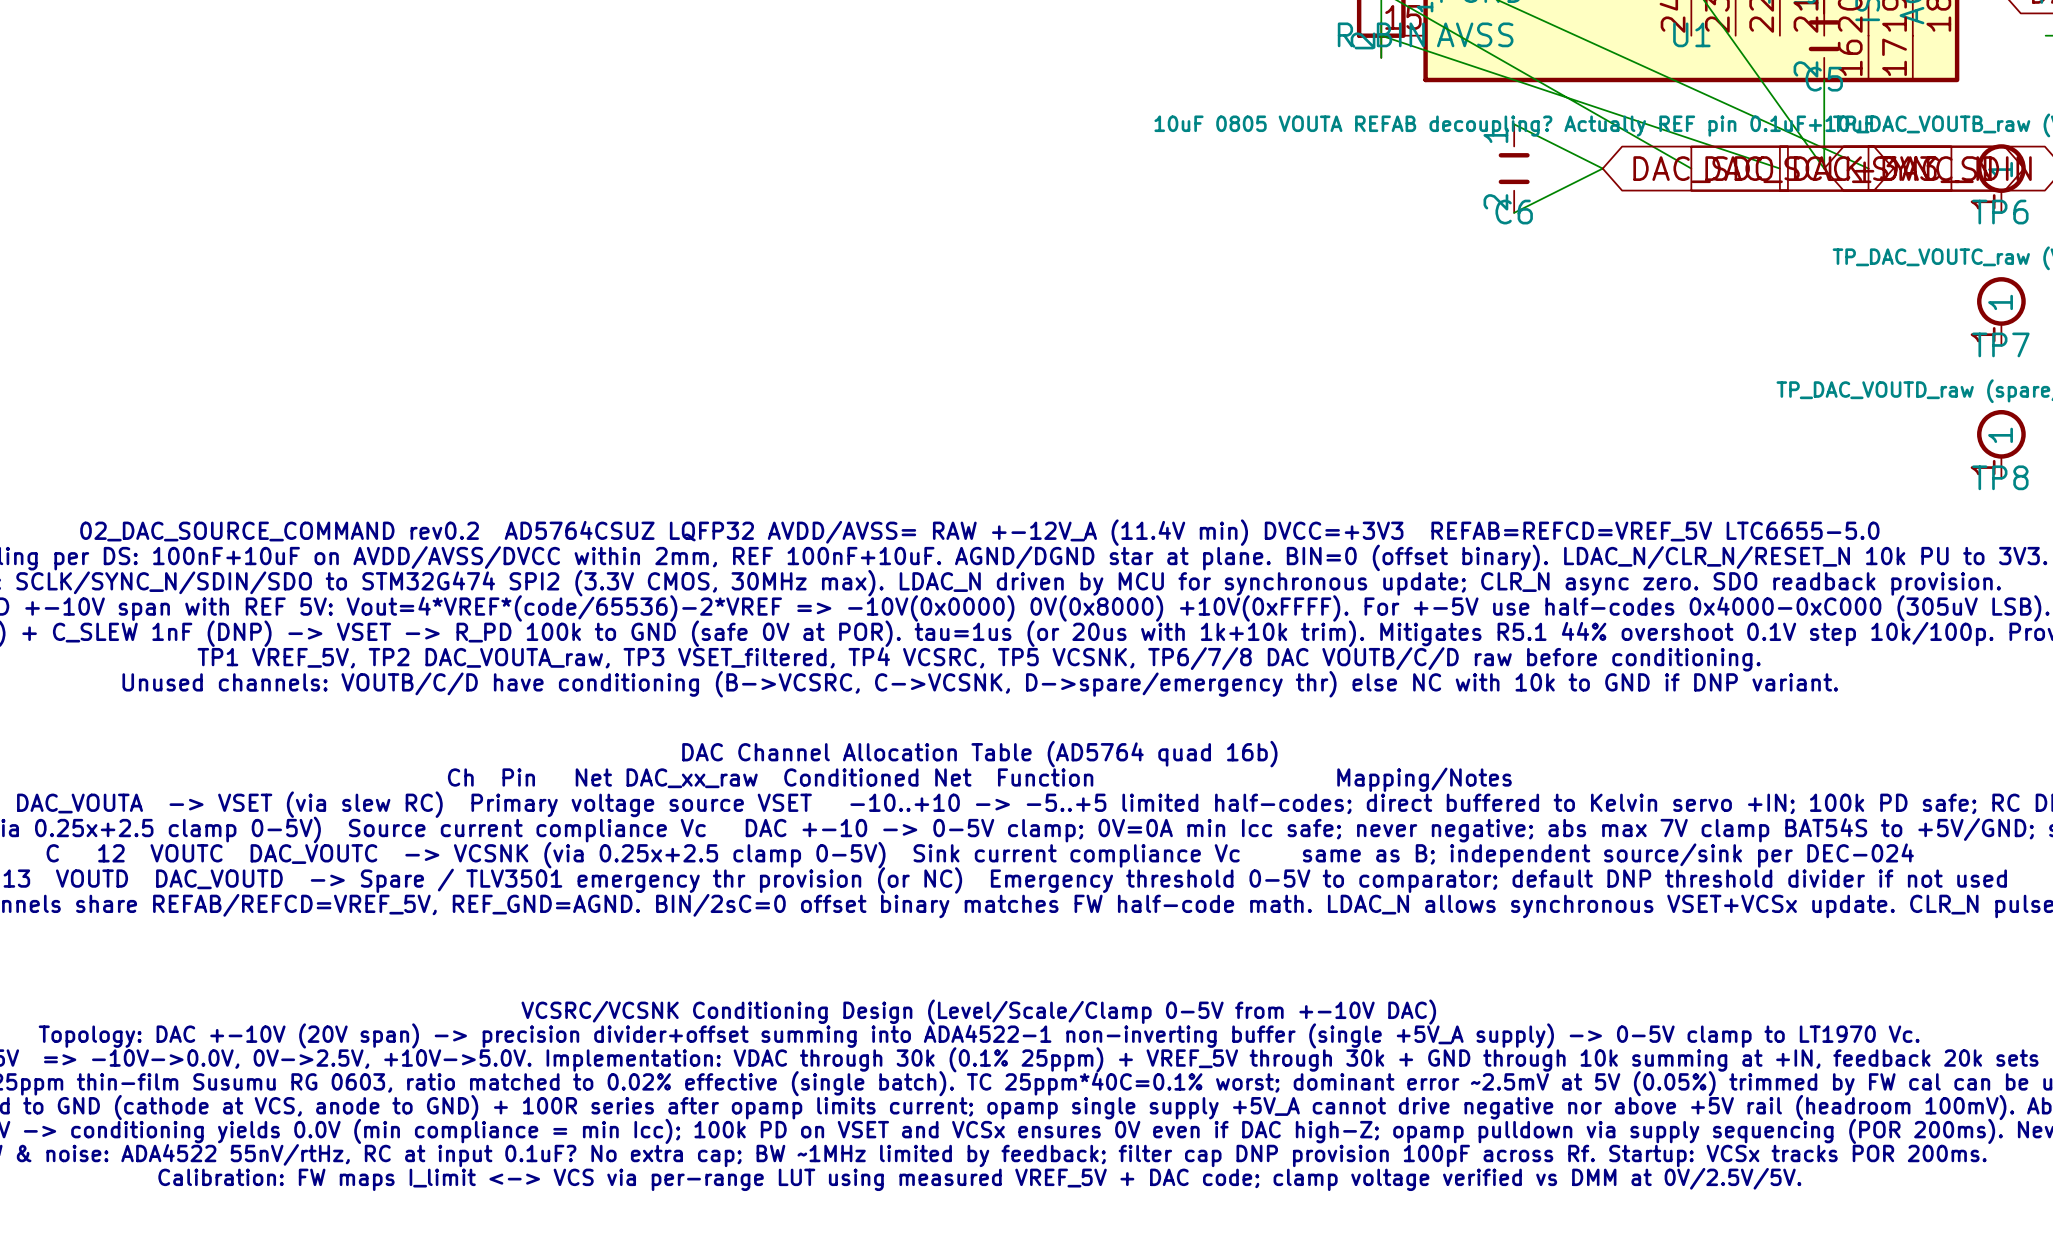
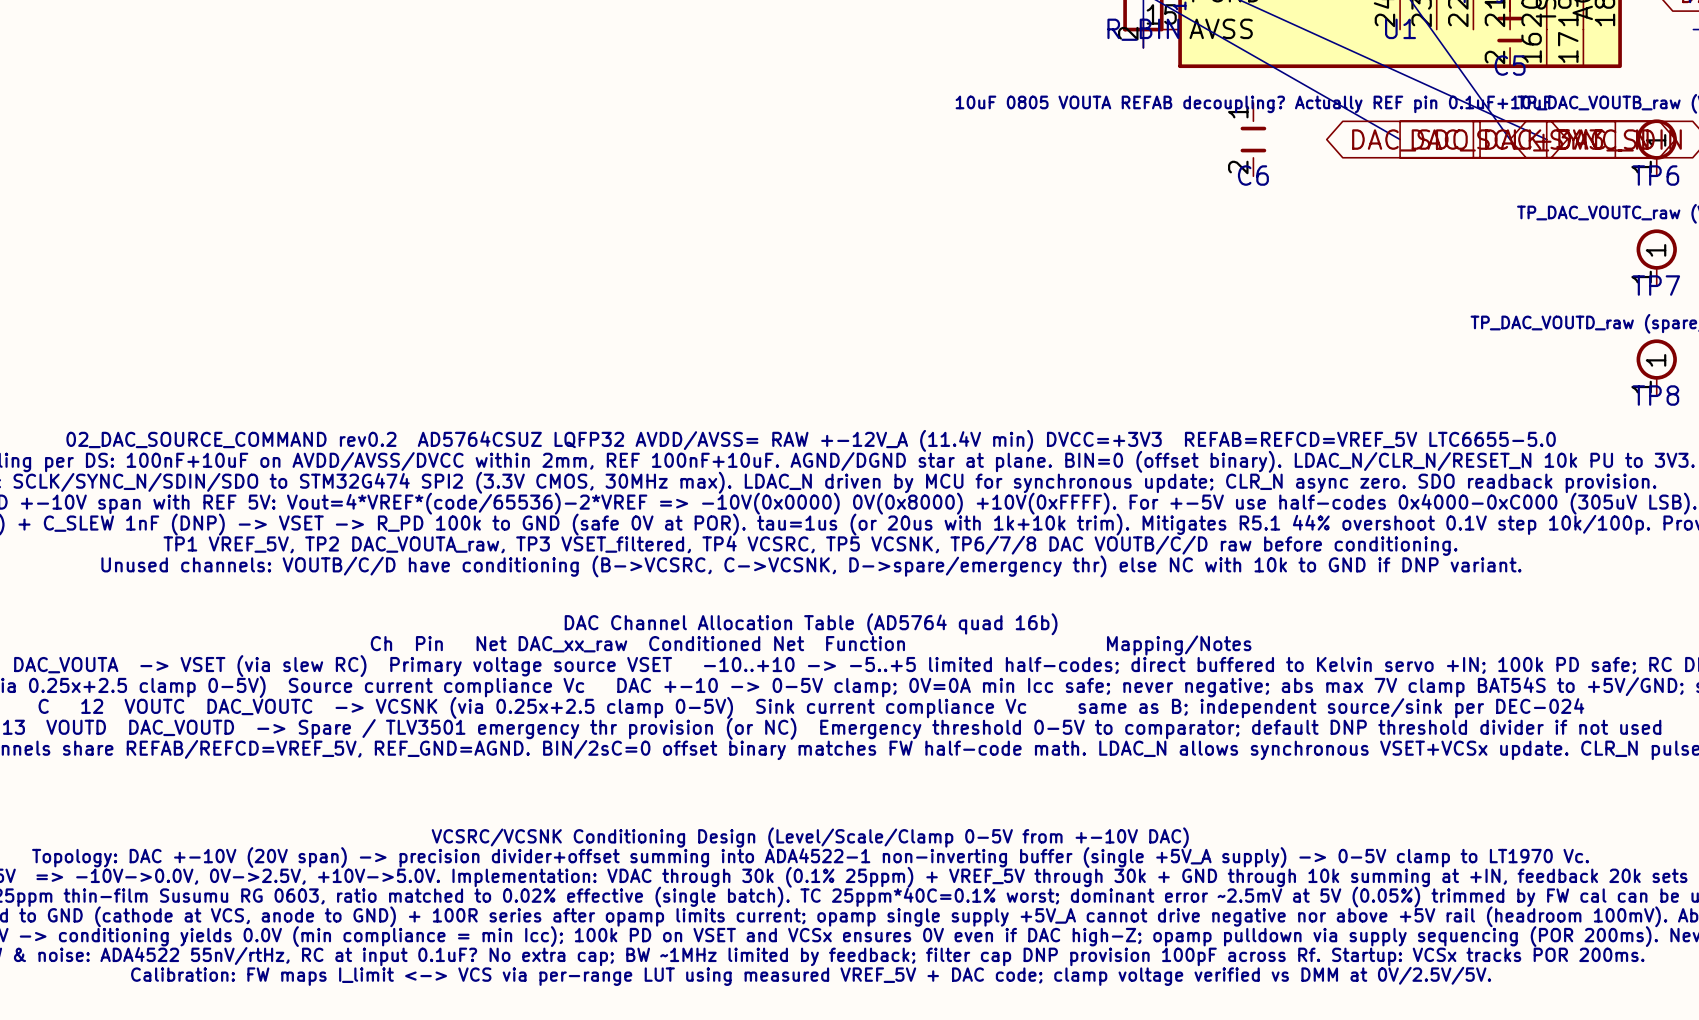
wire: (1381, 35) (1779, 168) -> none
wire: (1824, 79) (1824, 168) -> none
wire: (1514, 124) (1602, 168) (1514, 212) -> none

